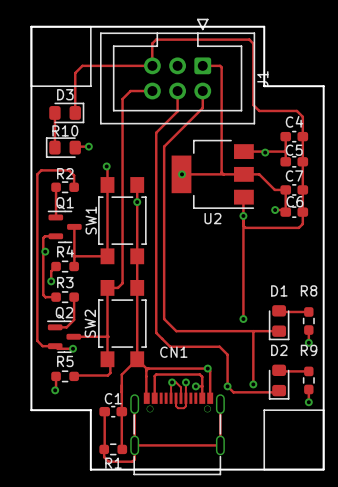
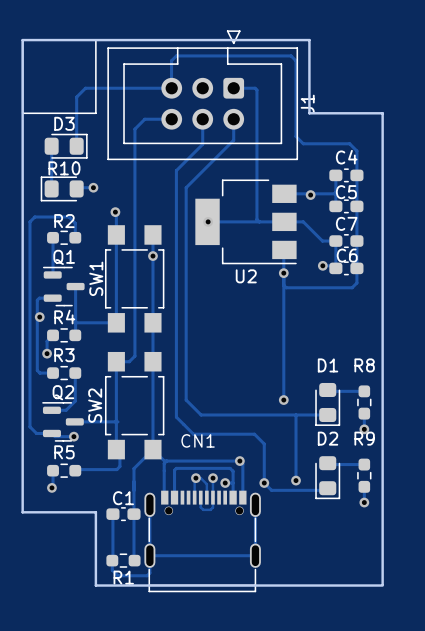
line: (264, 410) (323, 410) (323, 469) (264, 469) (264, 410) -> none

